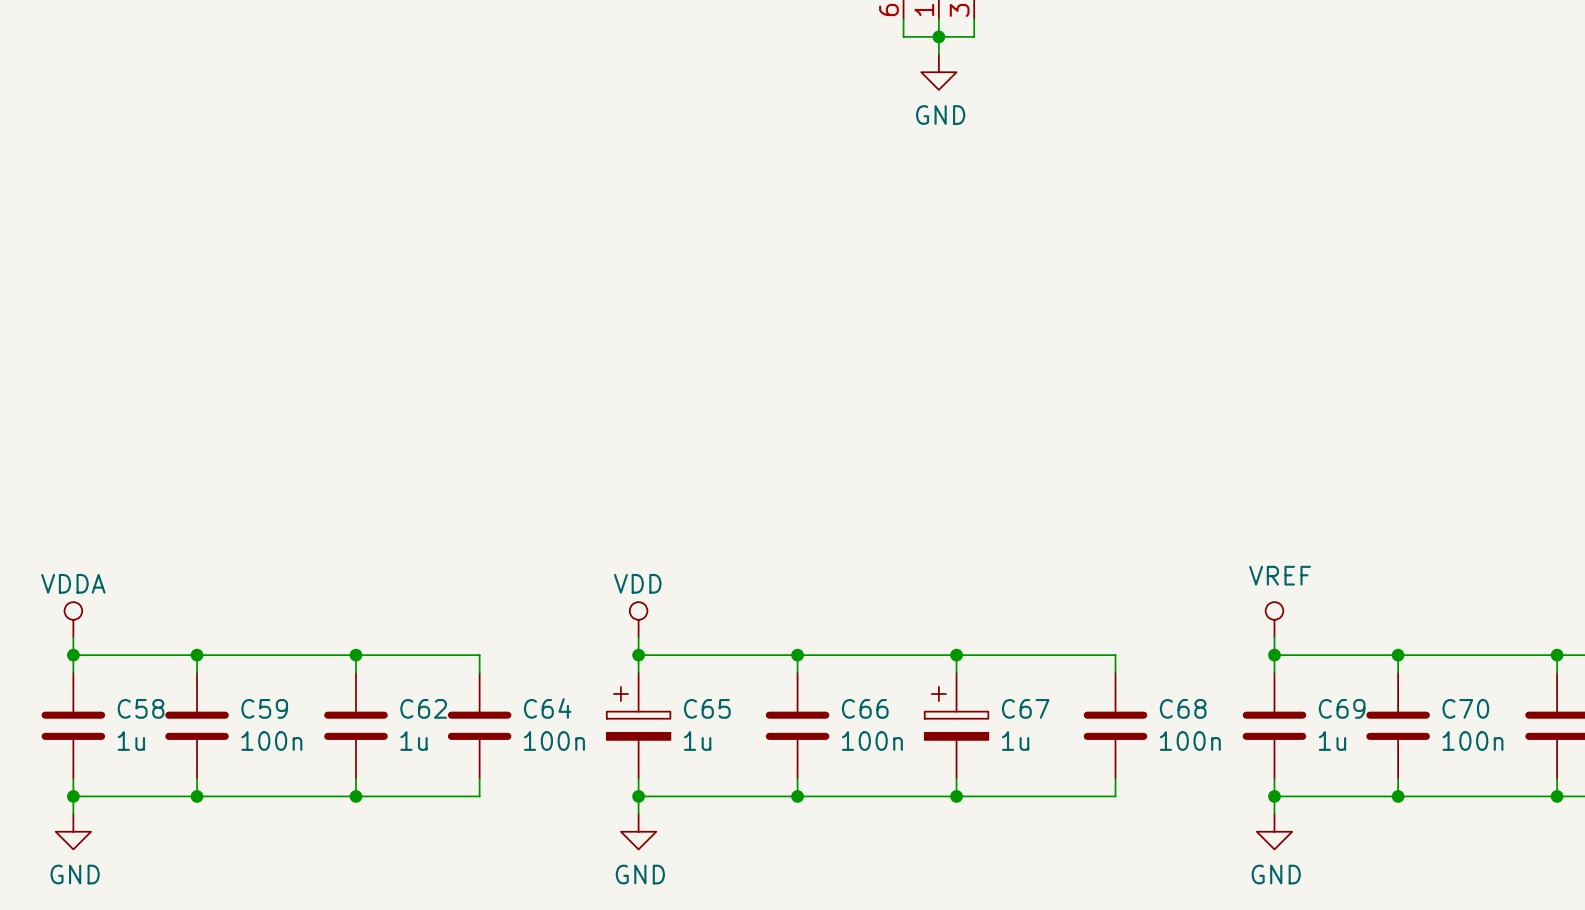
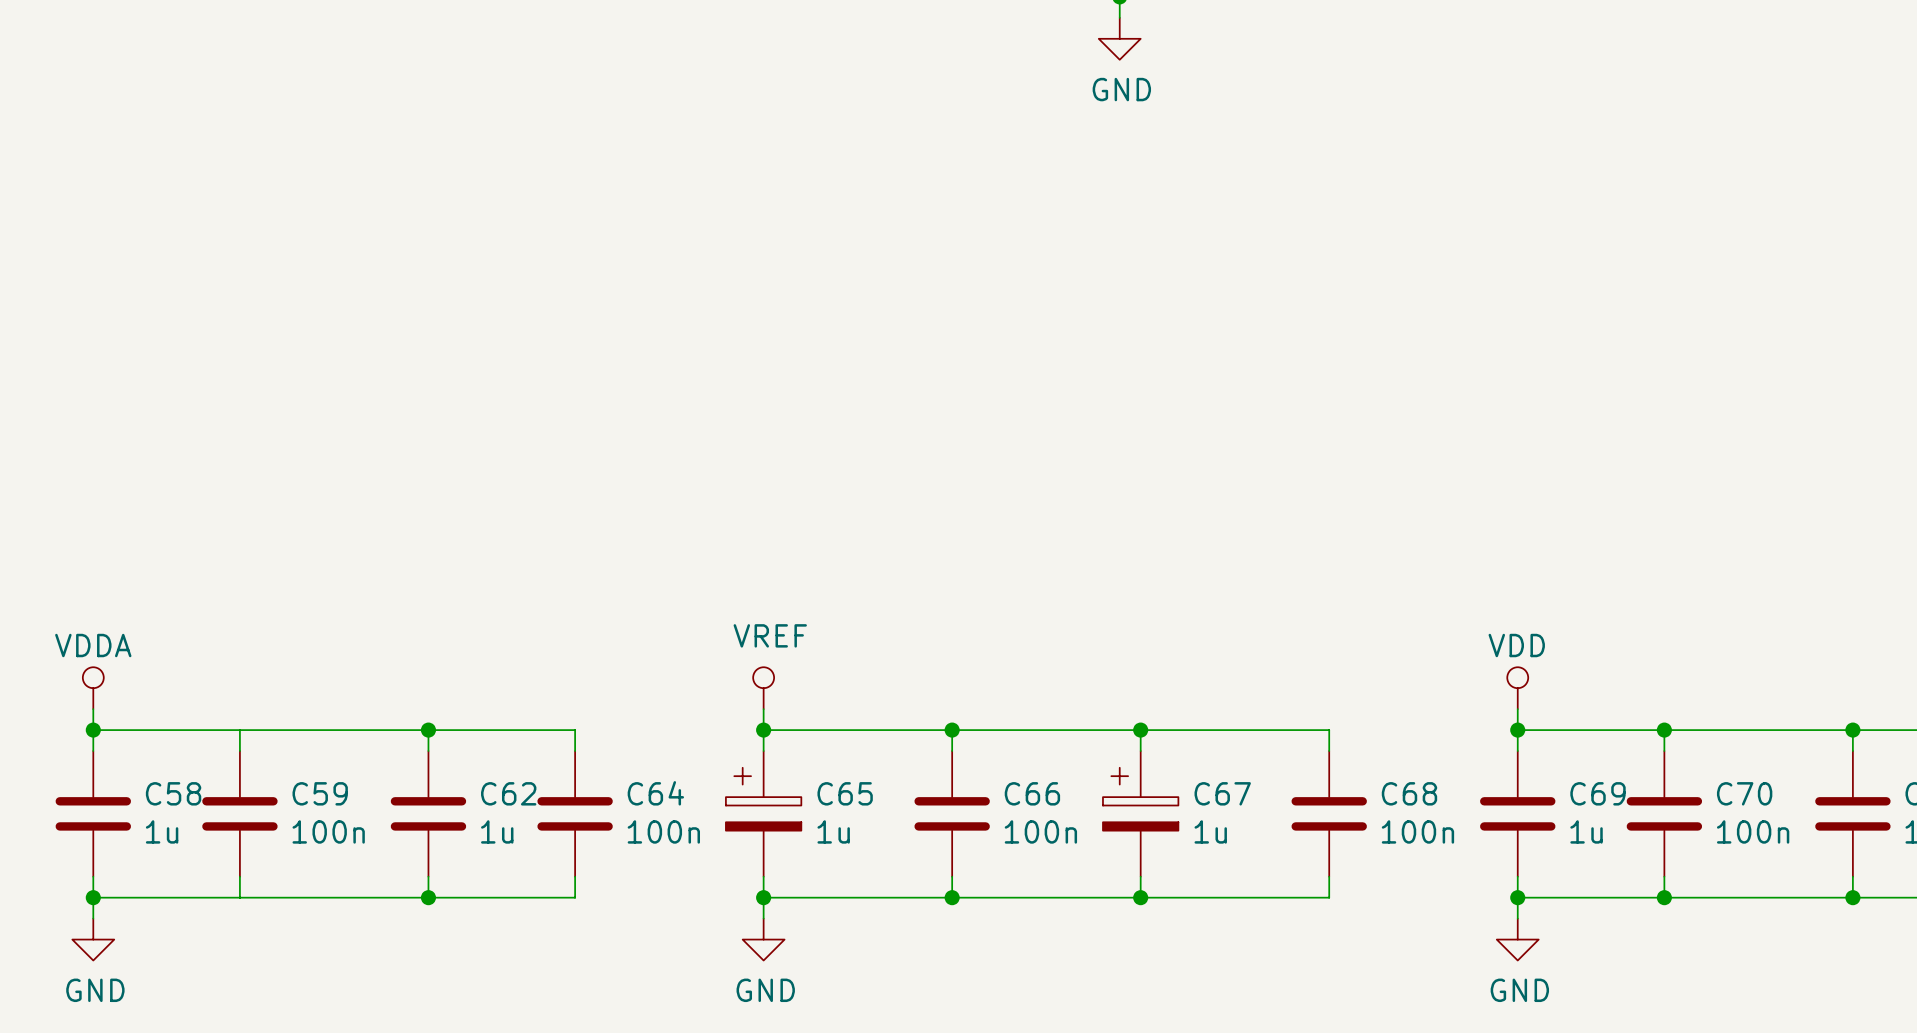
power symbol: VDD (638, 619) -> VREF (763, 688)
power symbol: VREF (1274, 619) -> VDD (1517, 688)
junction: (197, 655) -> none
junction: (197, 796) -> none

